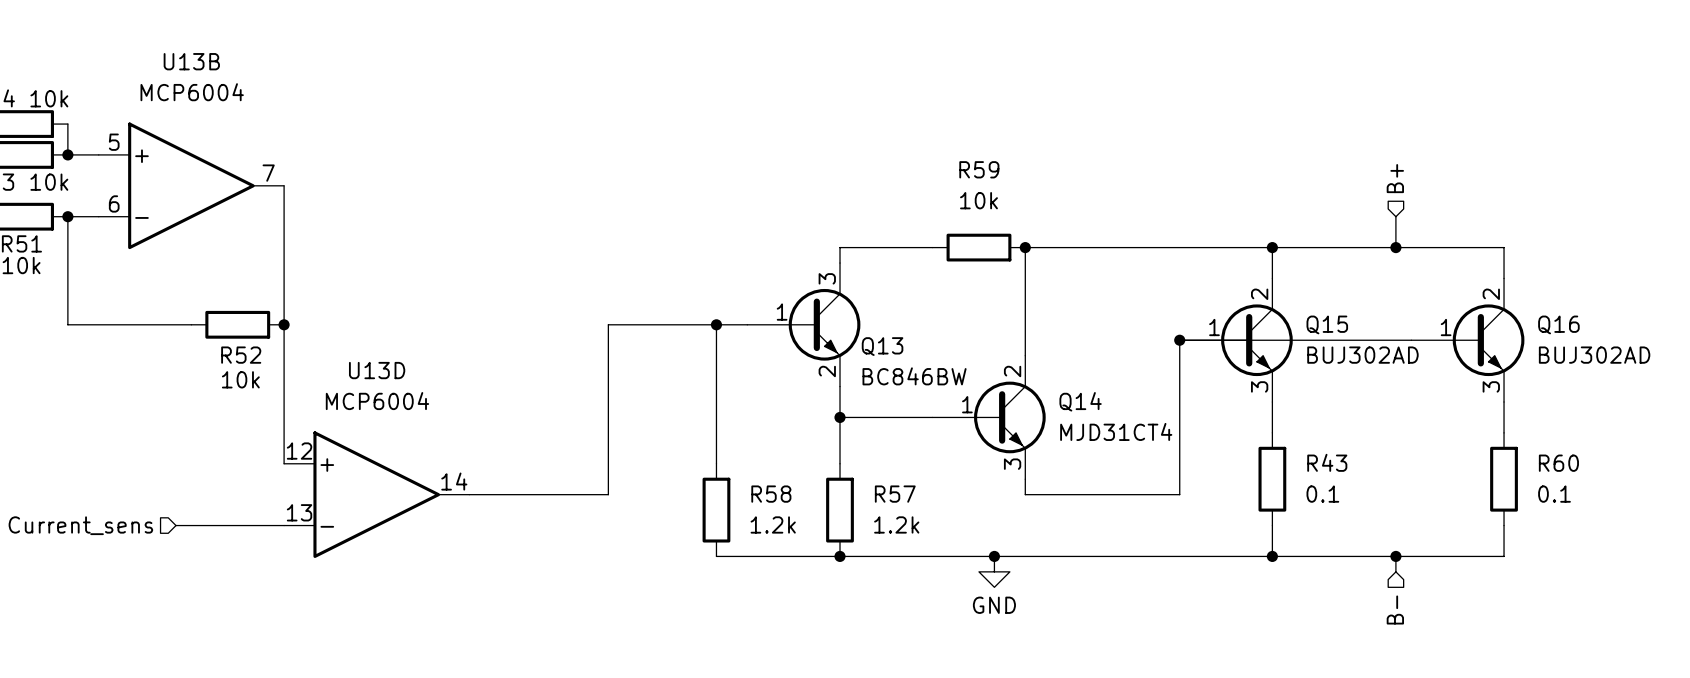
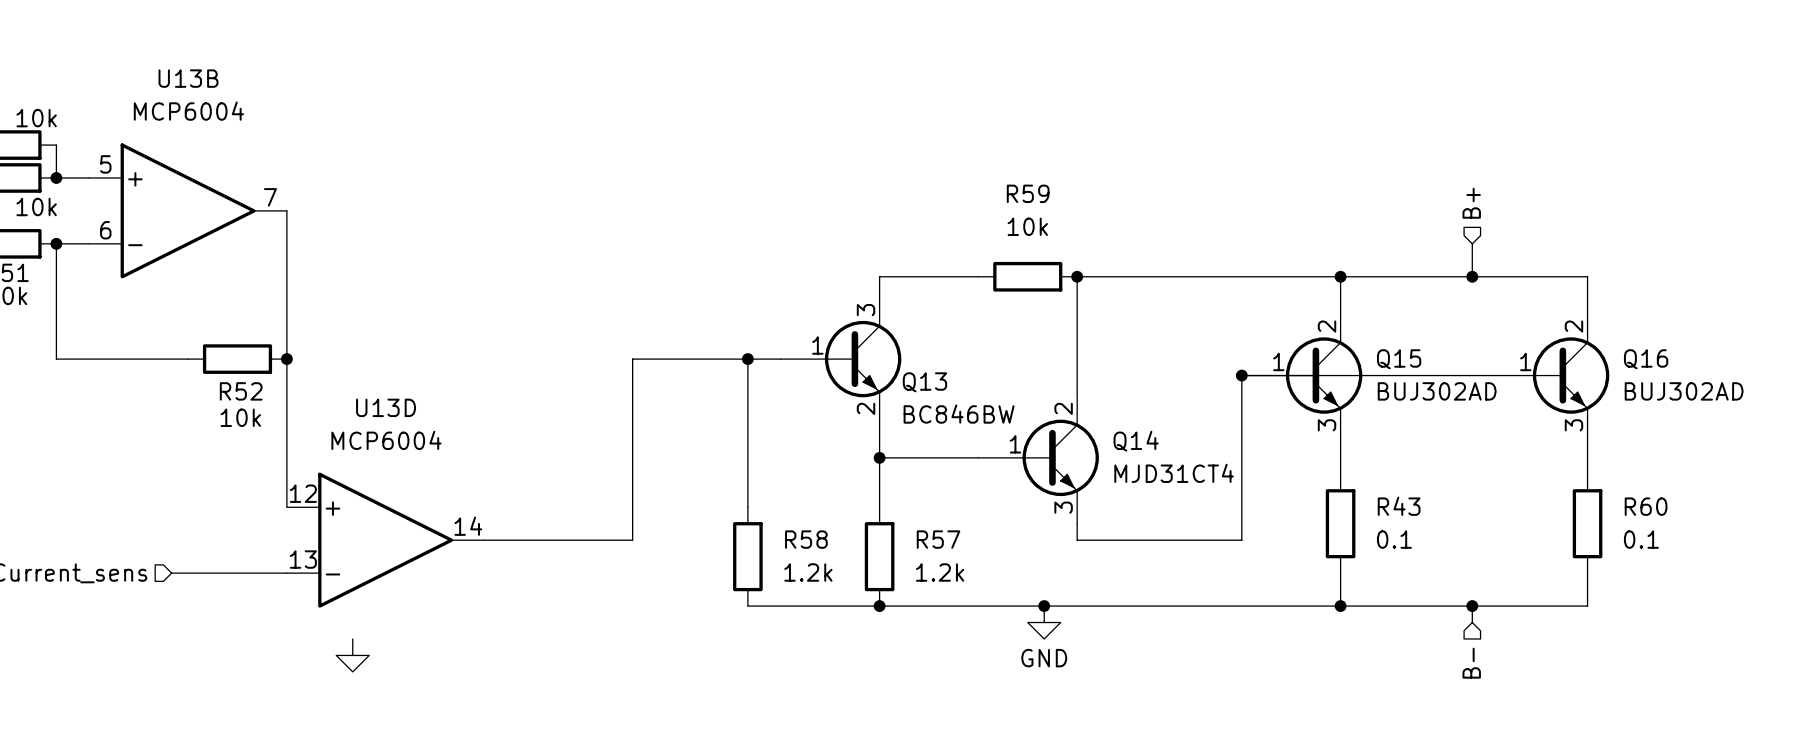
power symbol: none -> (352, 655)

